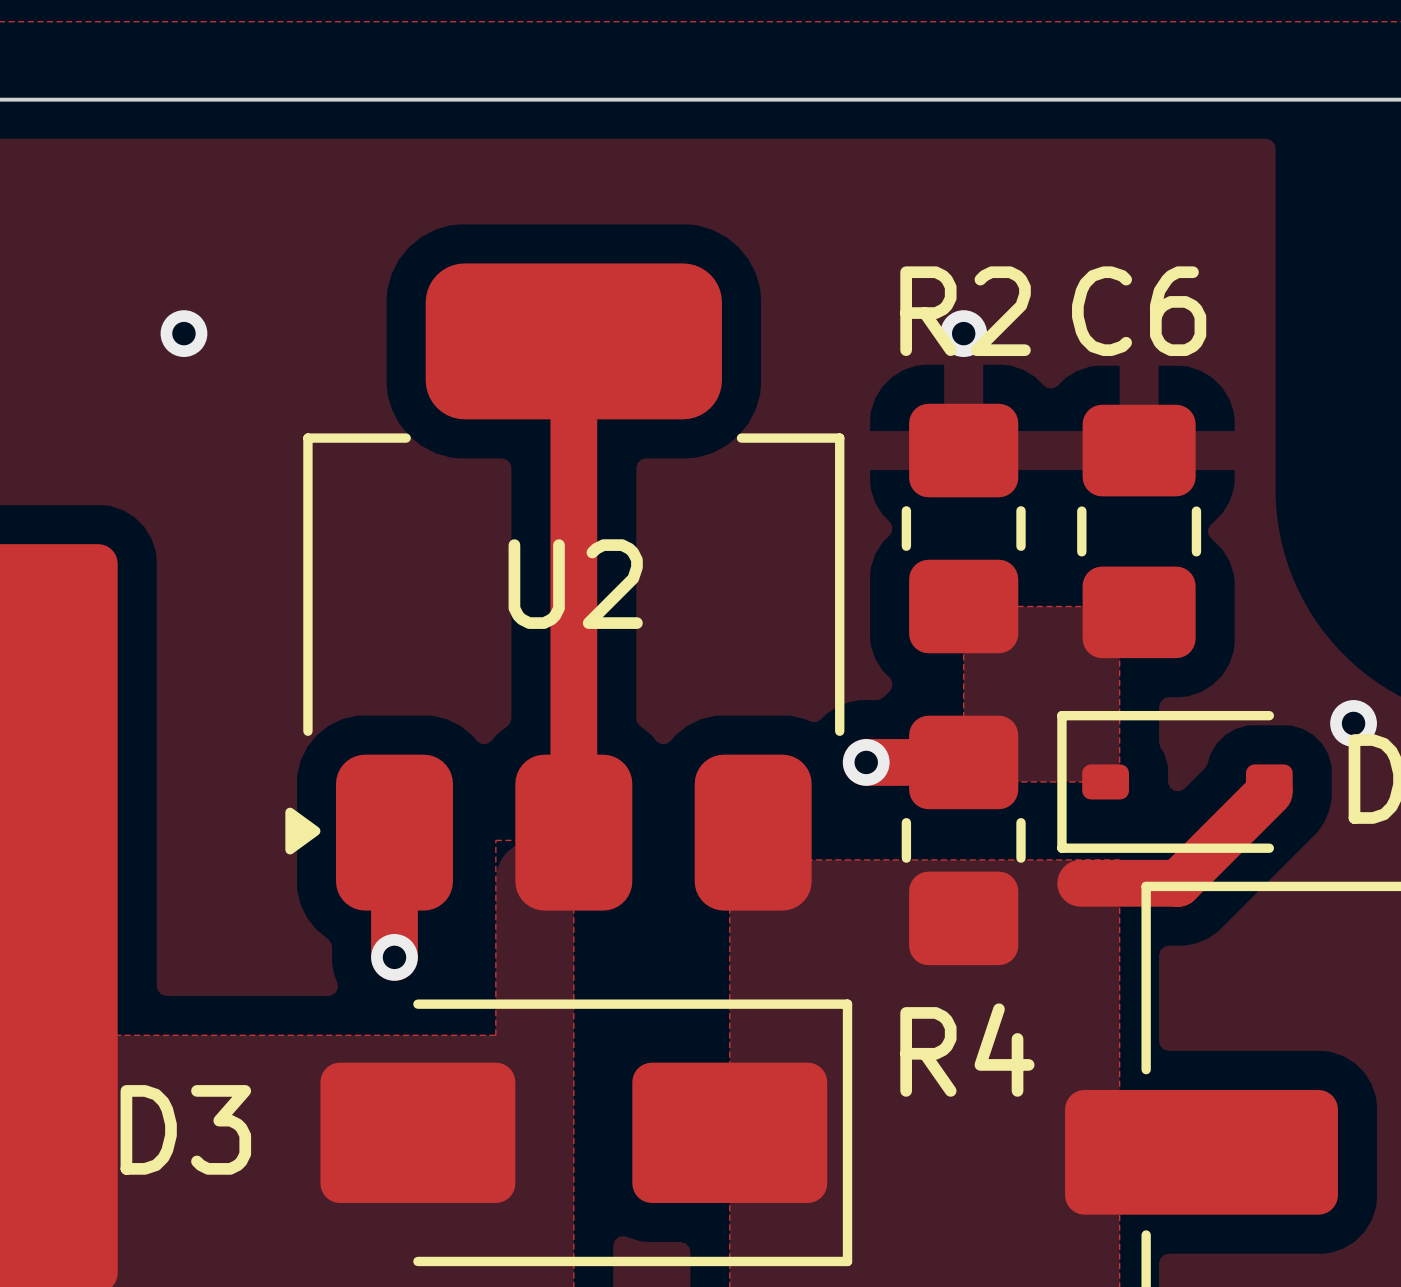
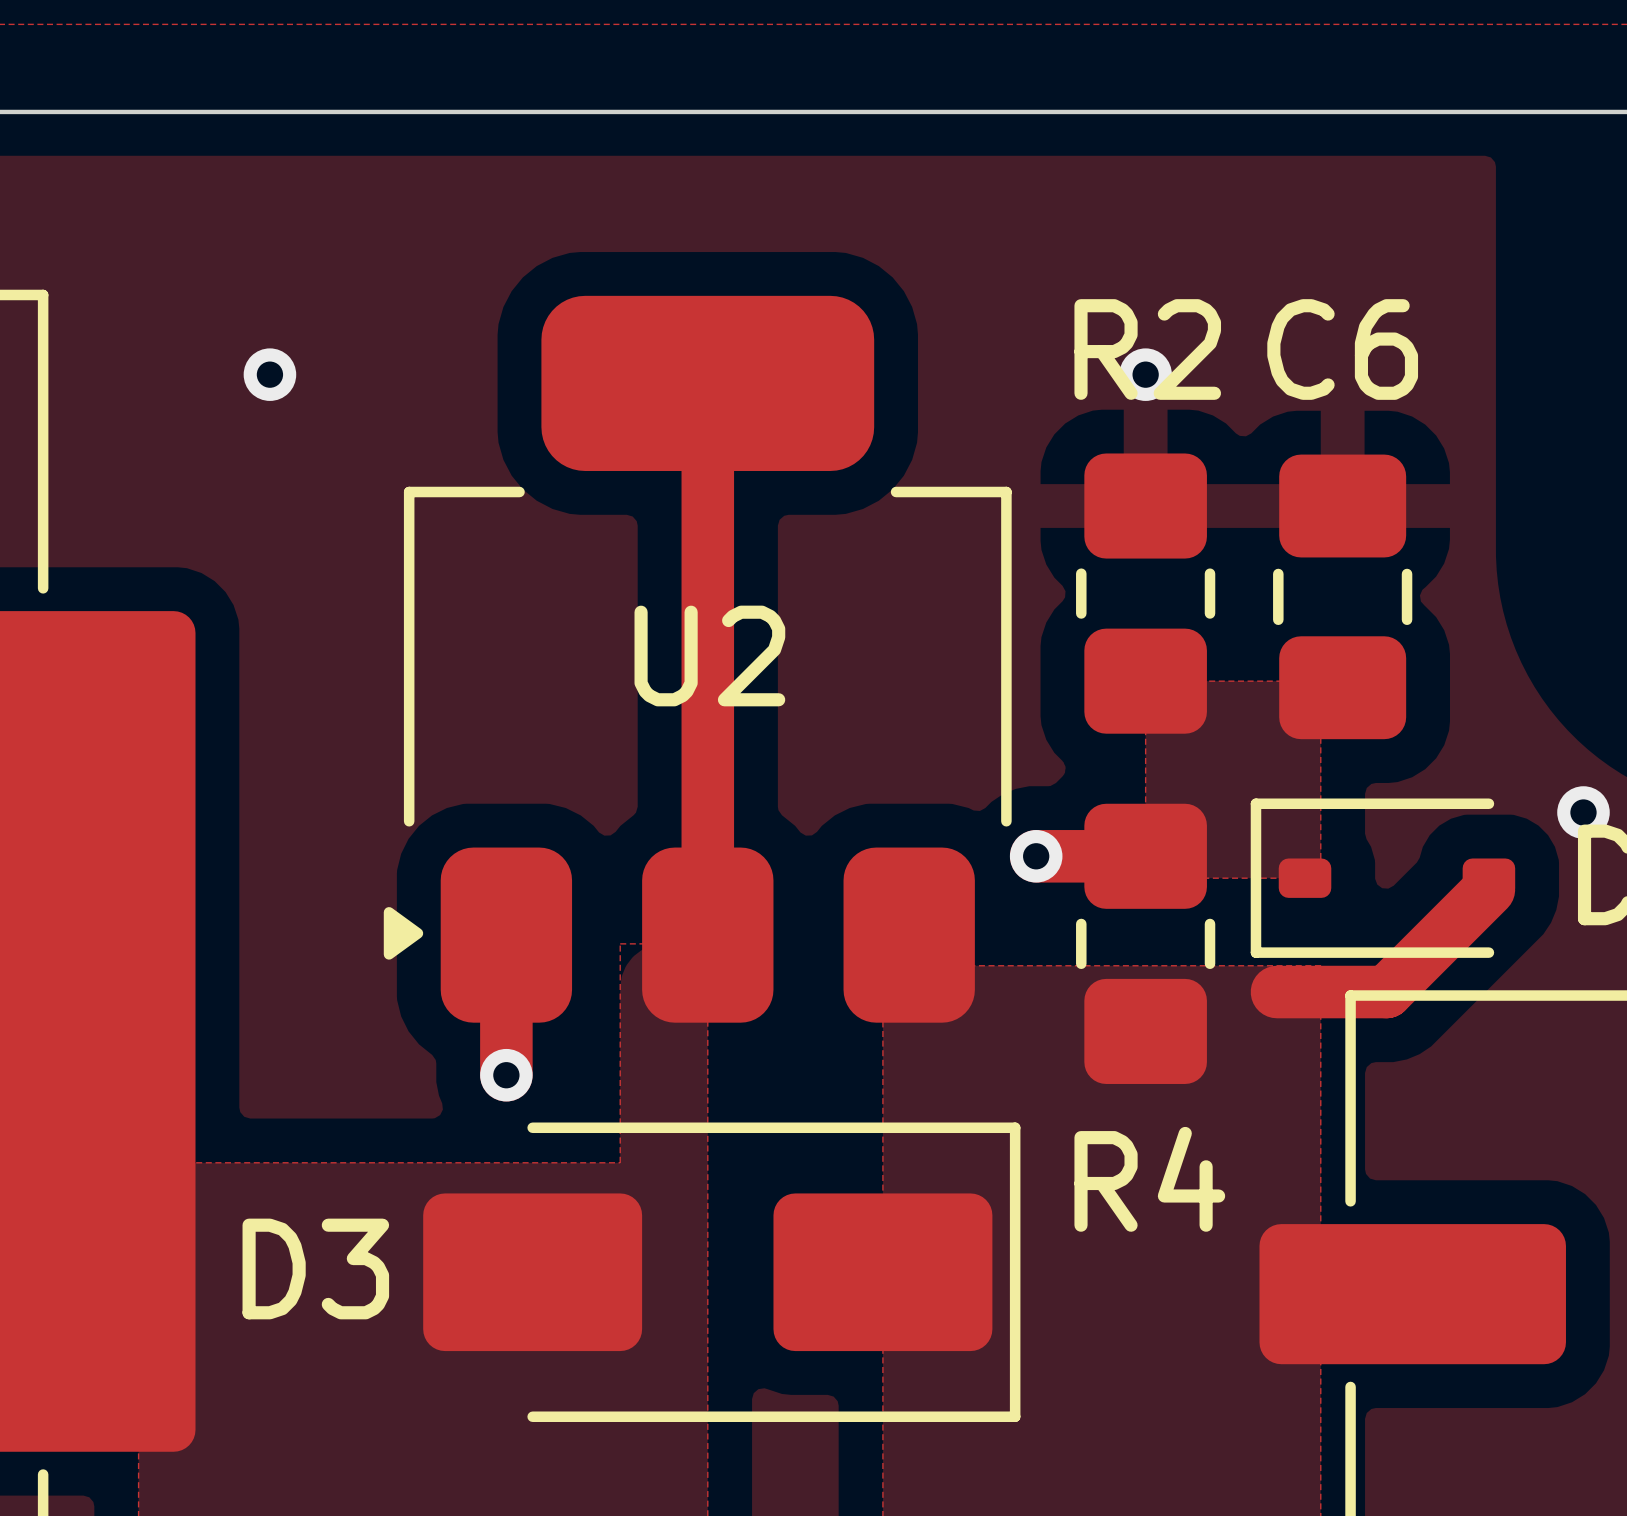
D3 name position: D3 (185, 1129) -> D3 (315, 1268)

